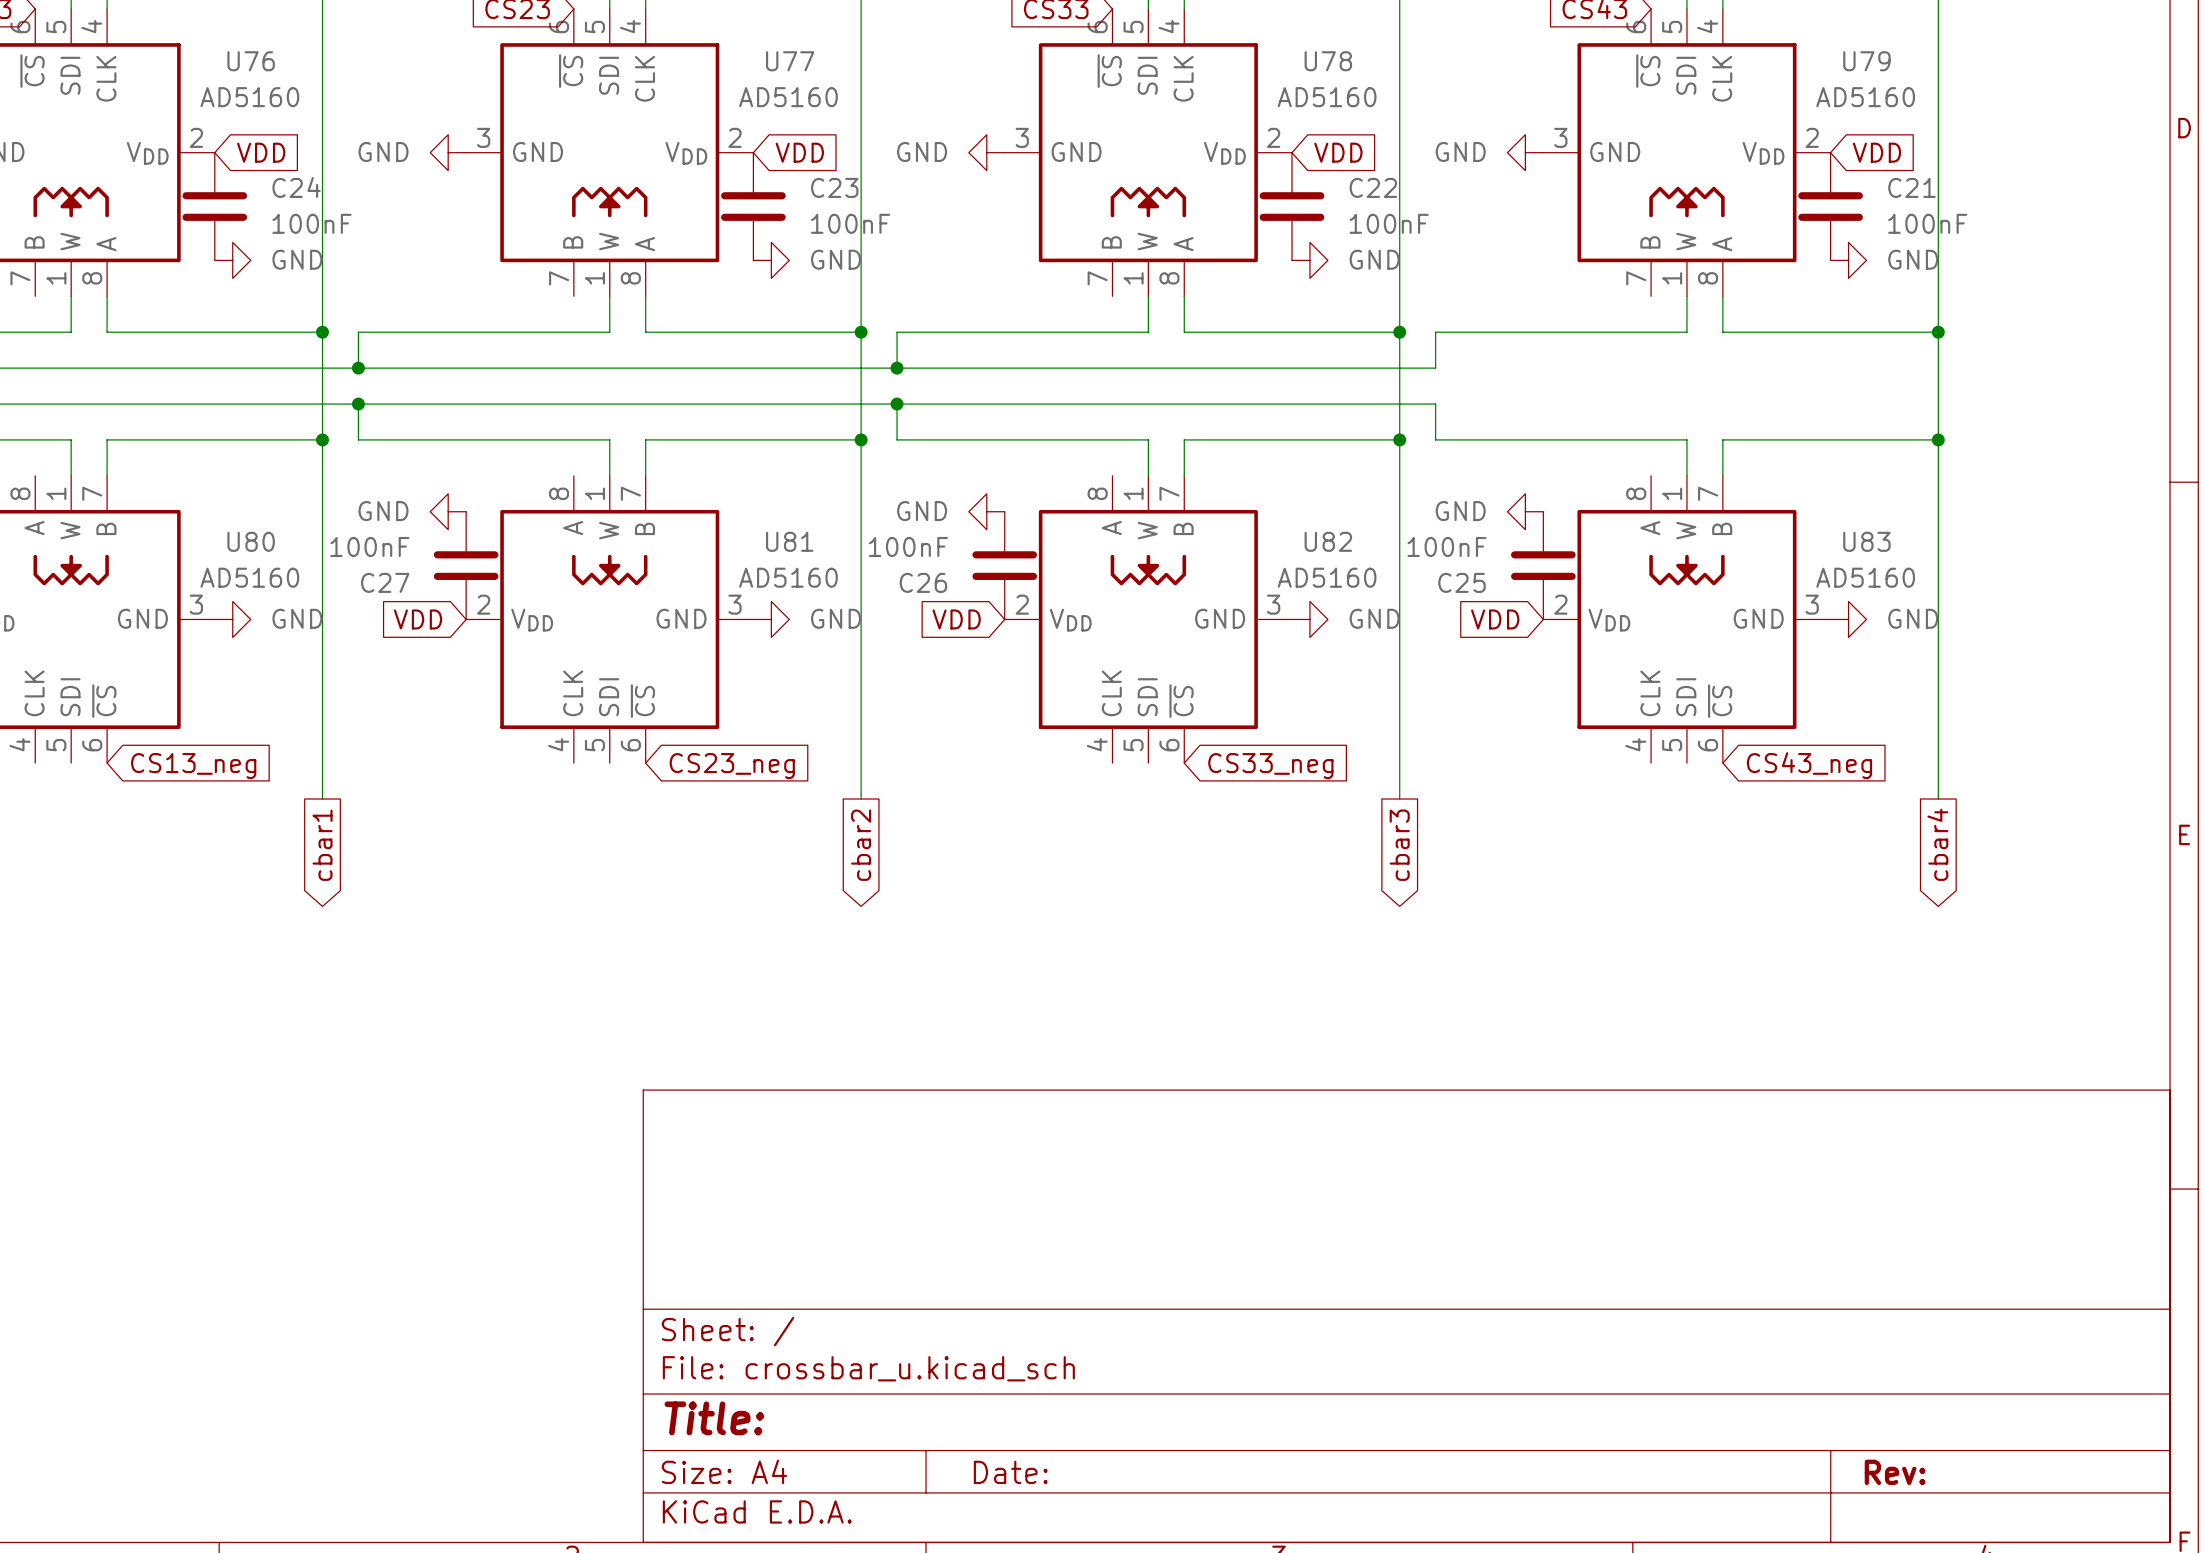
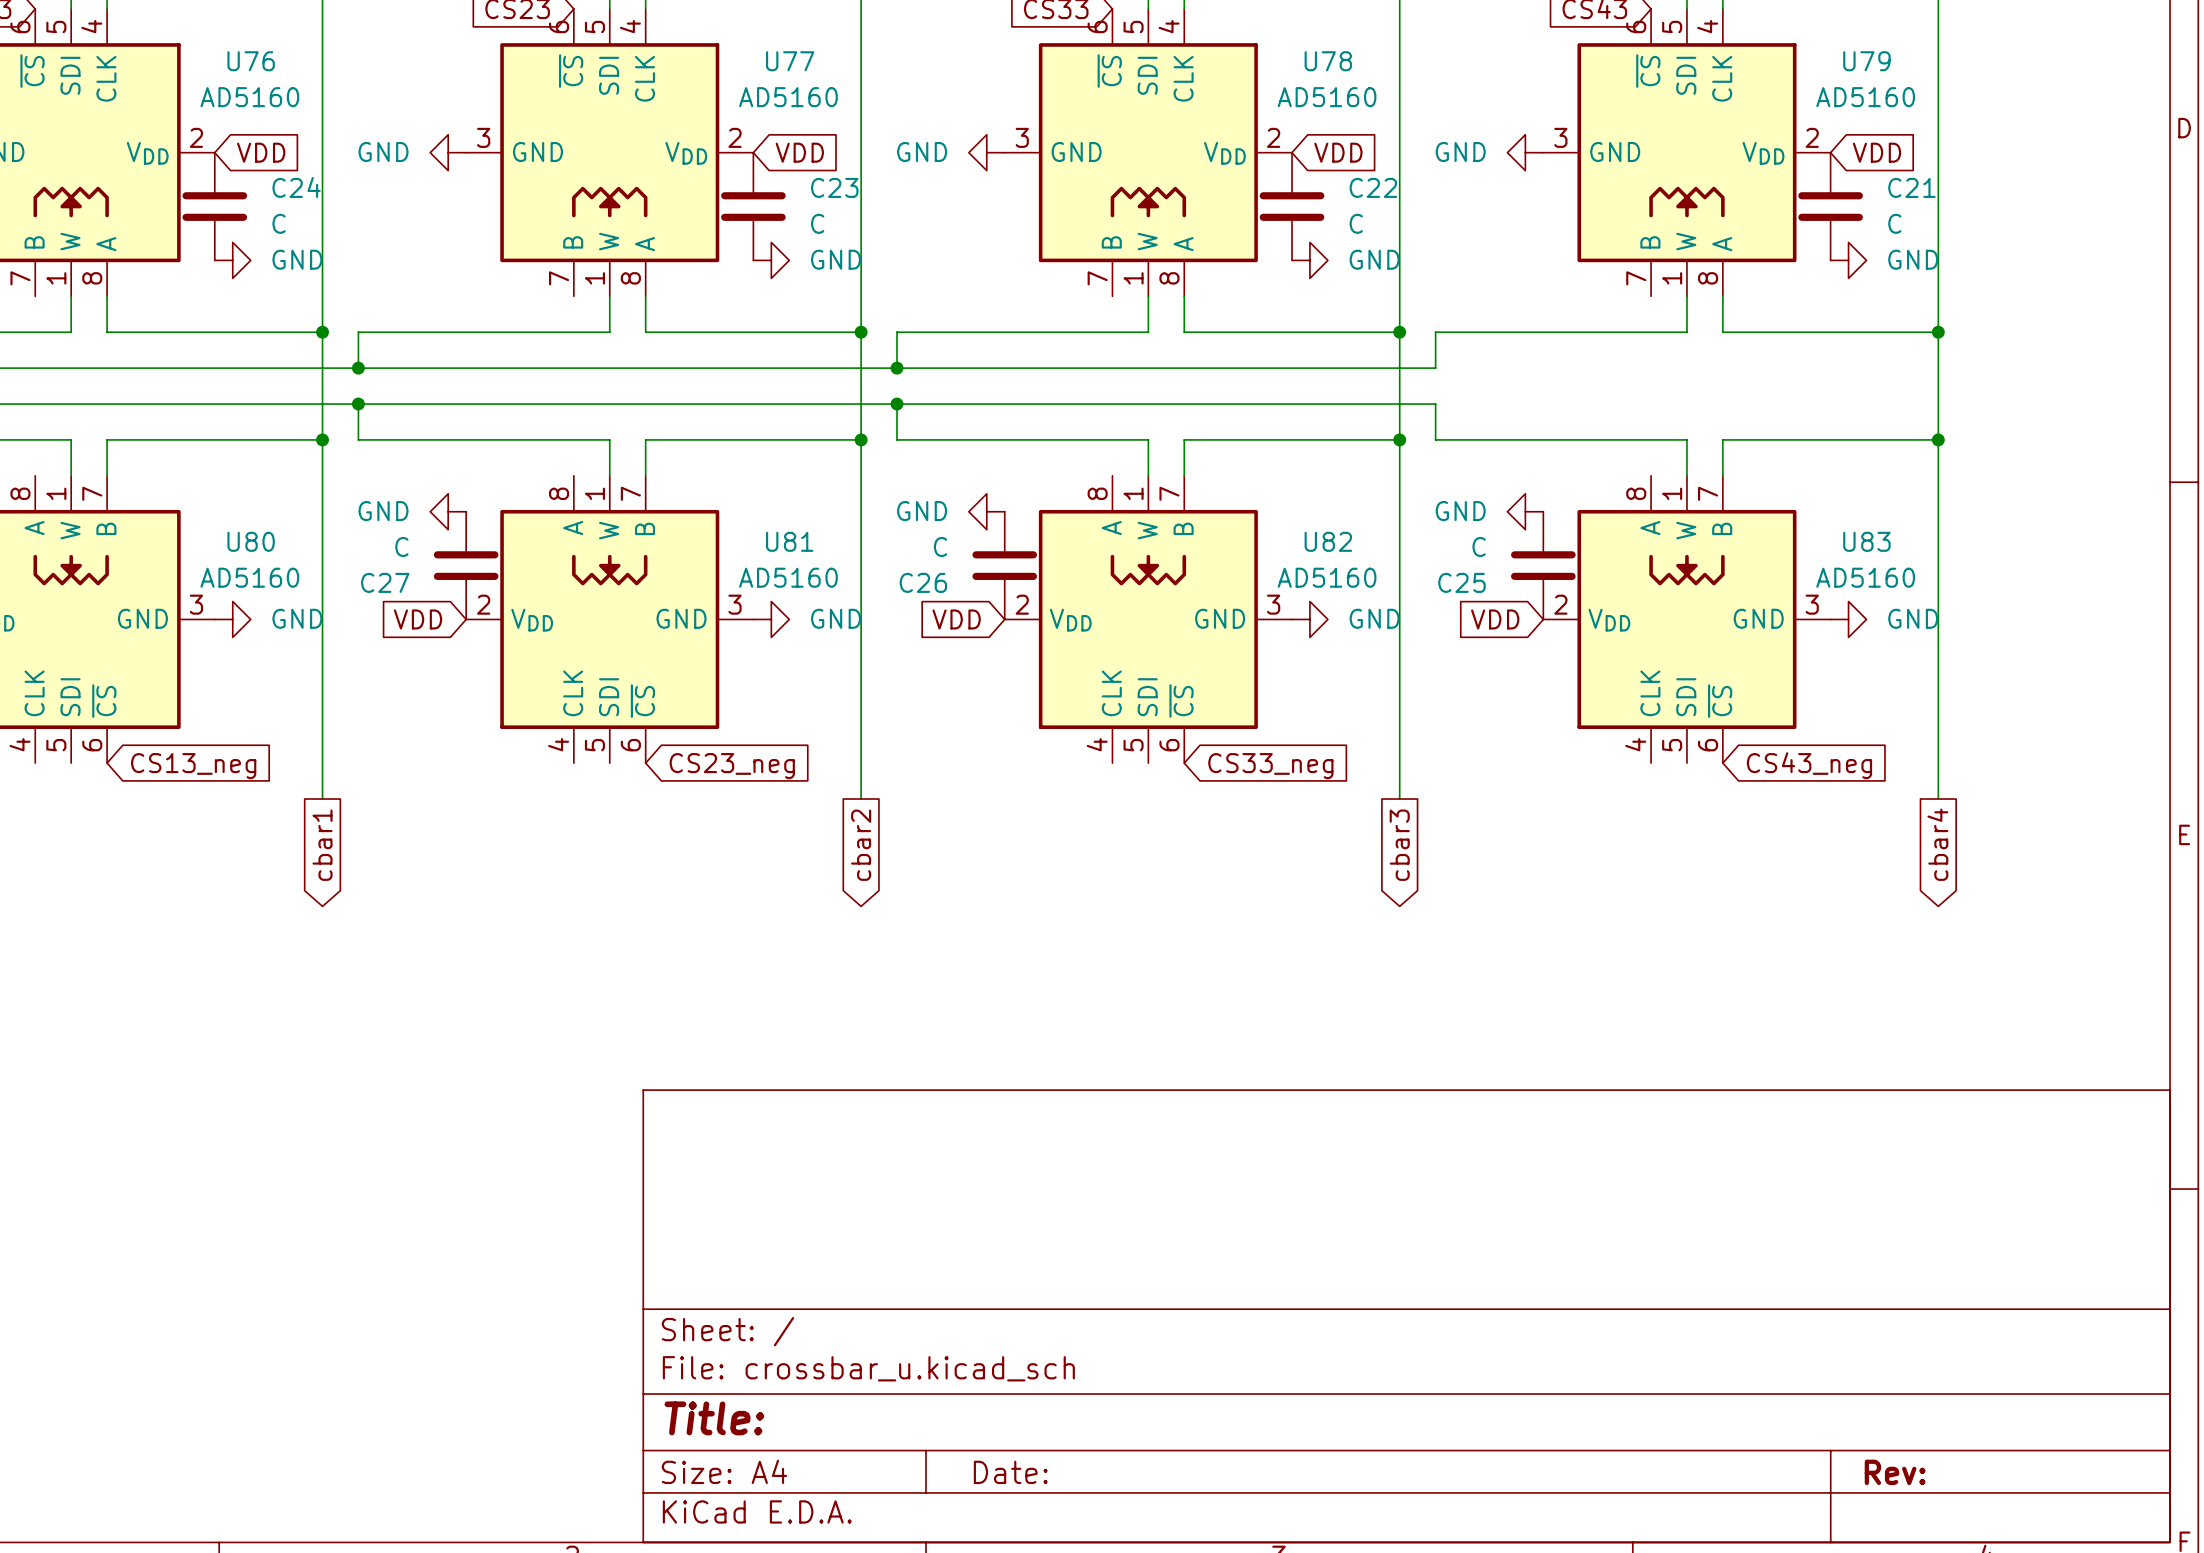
C24 value: 100nF (311, 223) -> C (279, 223)
C23 value: 100nF (850, 223) -> C (817, 223)
C22 value: 100nF (1389, 223) -> C (1356, 223)
C21 value: 100nF (1927, 223) -> C (1894, 223)
C27 value: 100nF (369, 546) -> C (401, 546)
C26 value: 100nF (908, 546) -> C (940, 546)
C25 value: 100nF (1447, 546) -> C (1479, 546)

